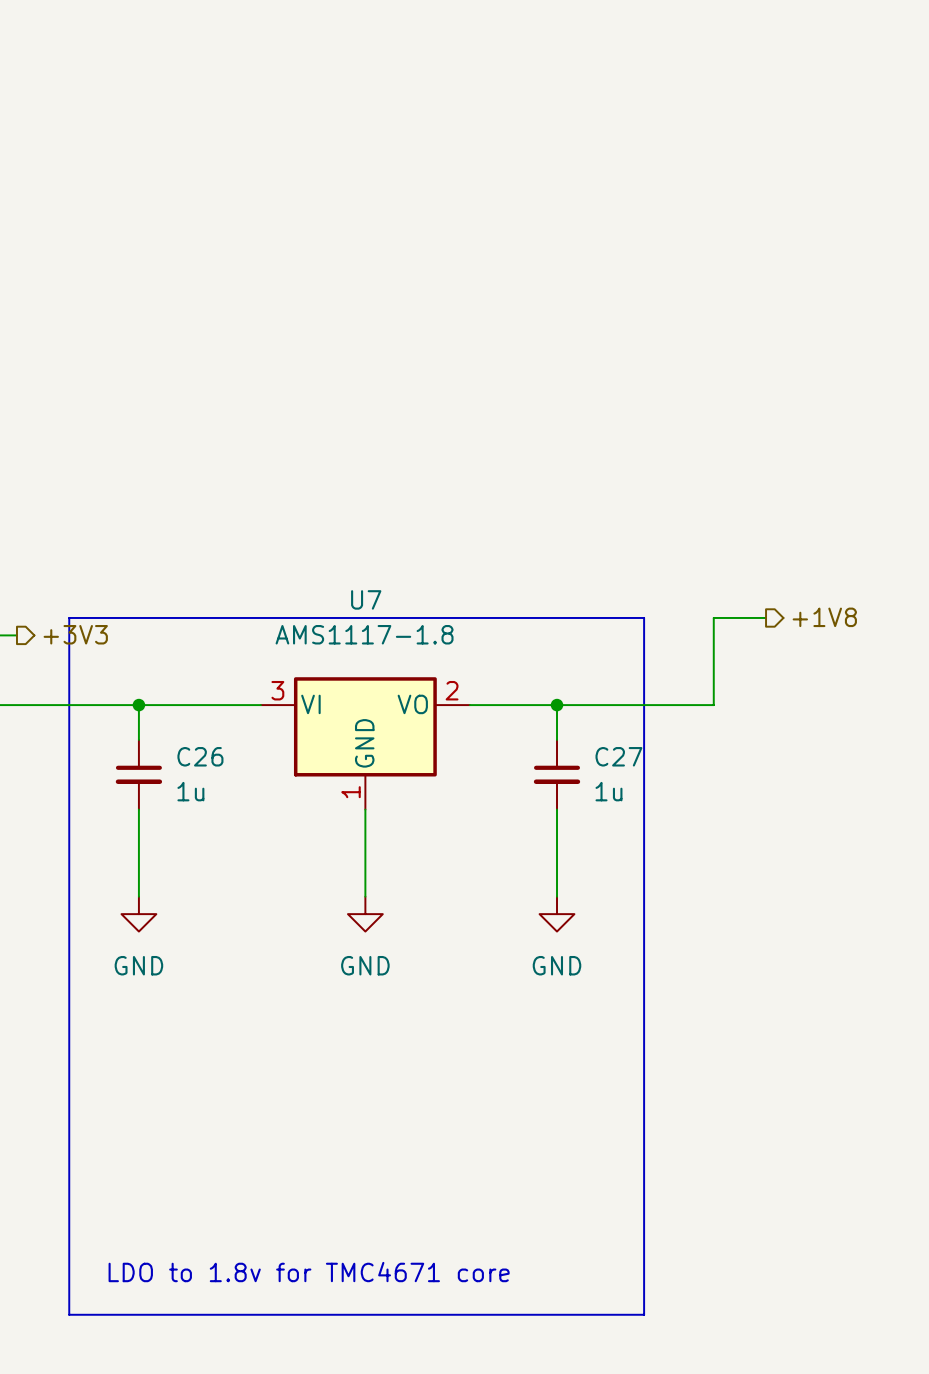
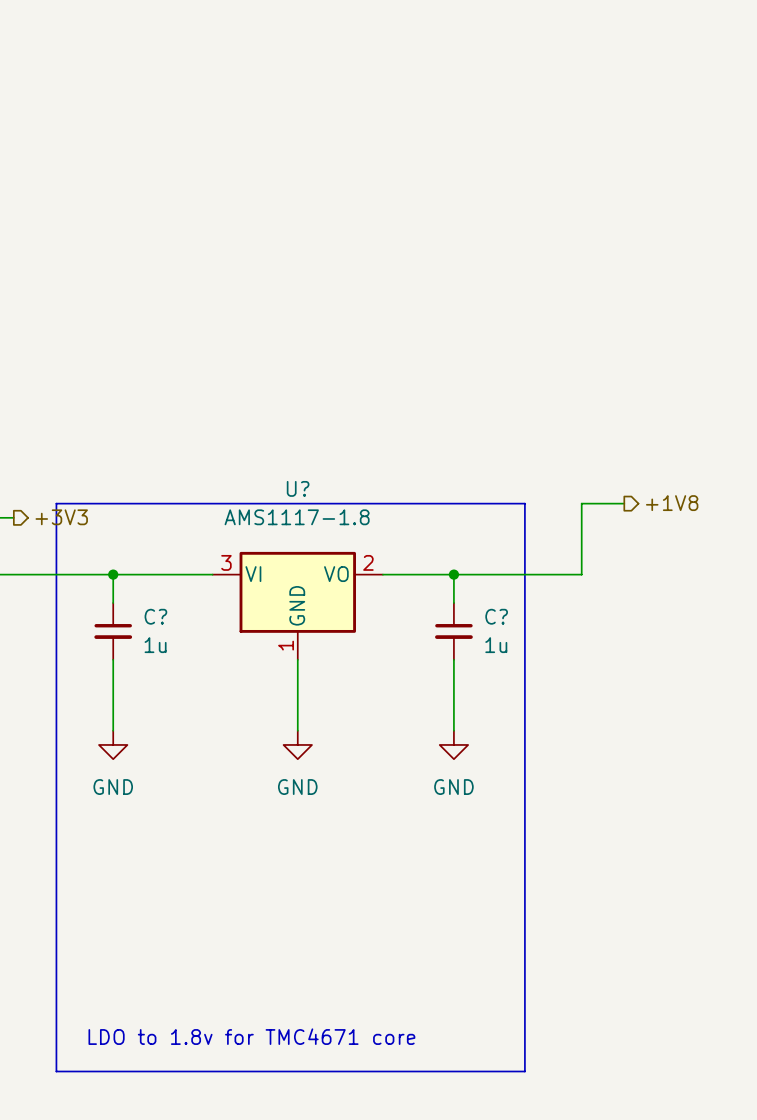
U7 name: U7 (366, 599) -> U? (298, 488)
C26 name: C26 (200, 756) -> C? (155, 616)
C27 name: C27 (618, 756) -> C? (496, 616)

